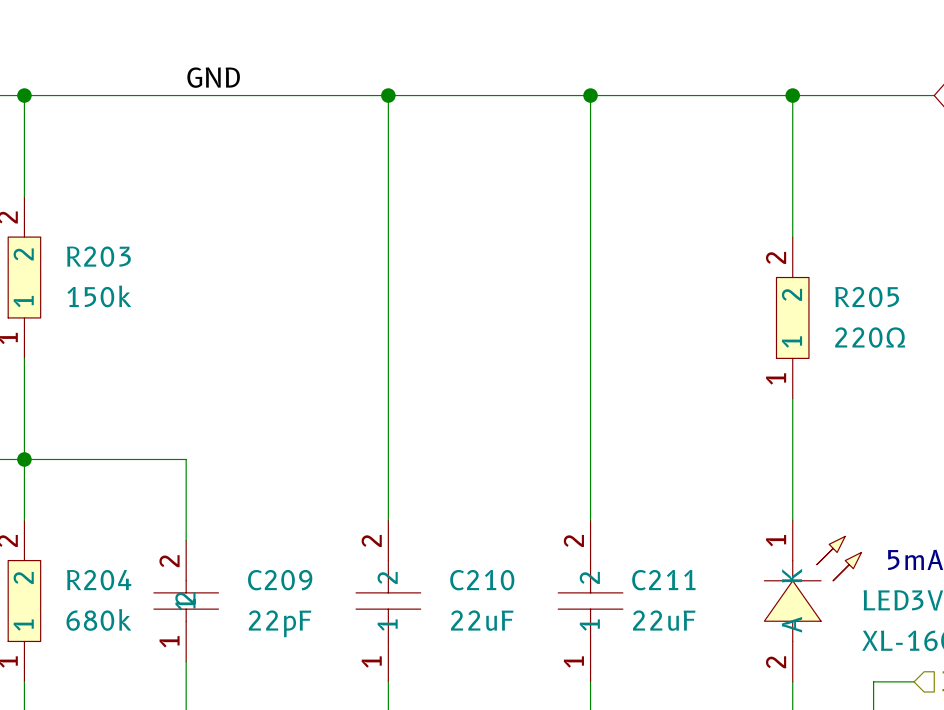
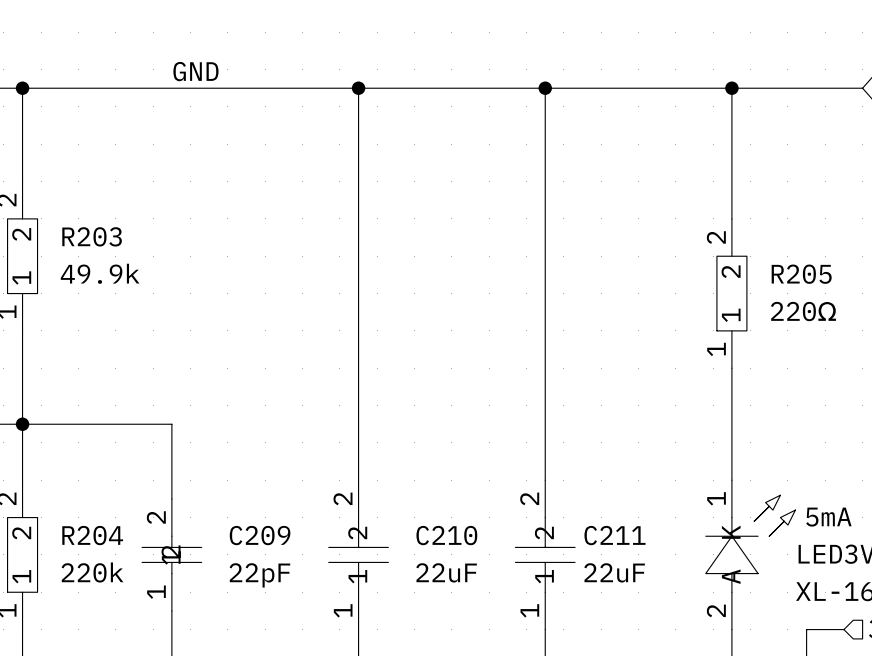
R203 value: 150k (99, 296) -> 49.9k (100, 273)
R204 value: 680k (98, 619) -> 220k (92, 572)

